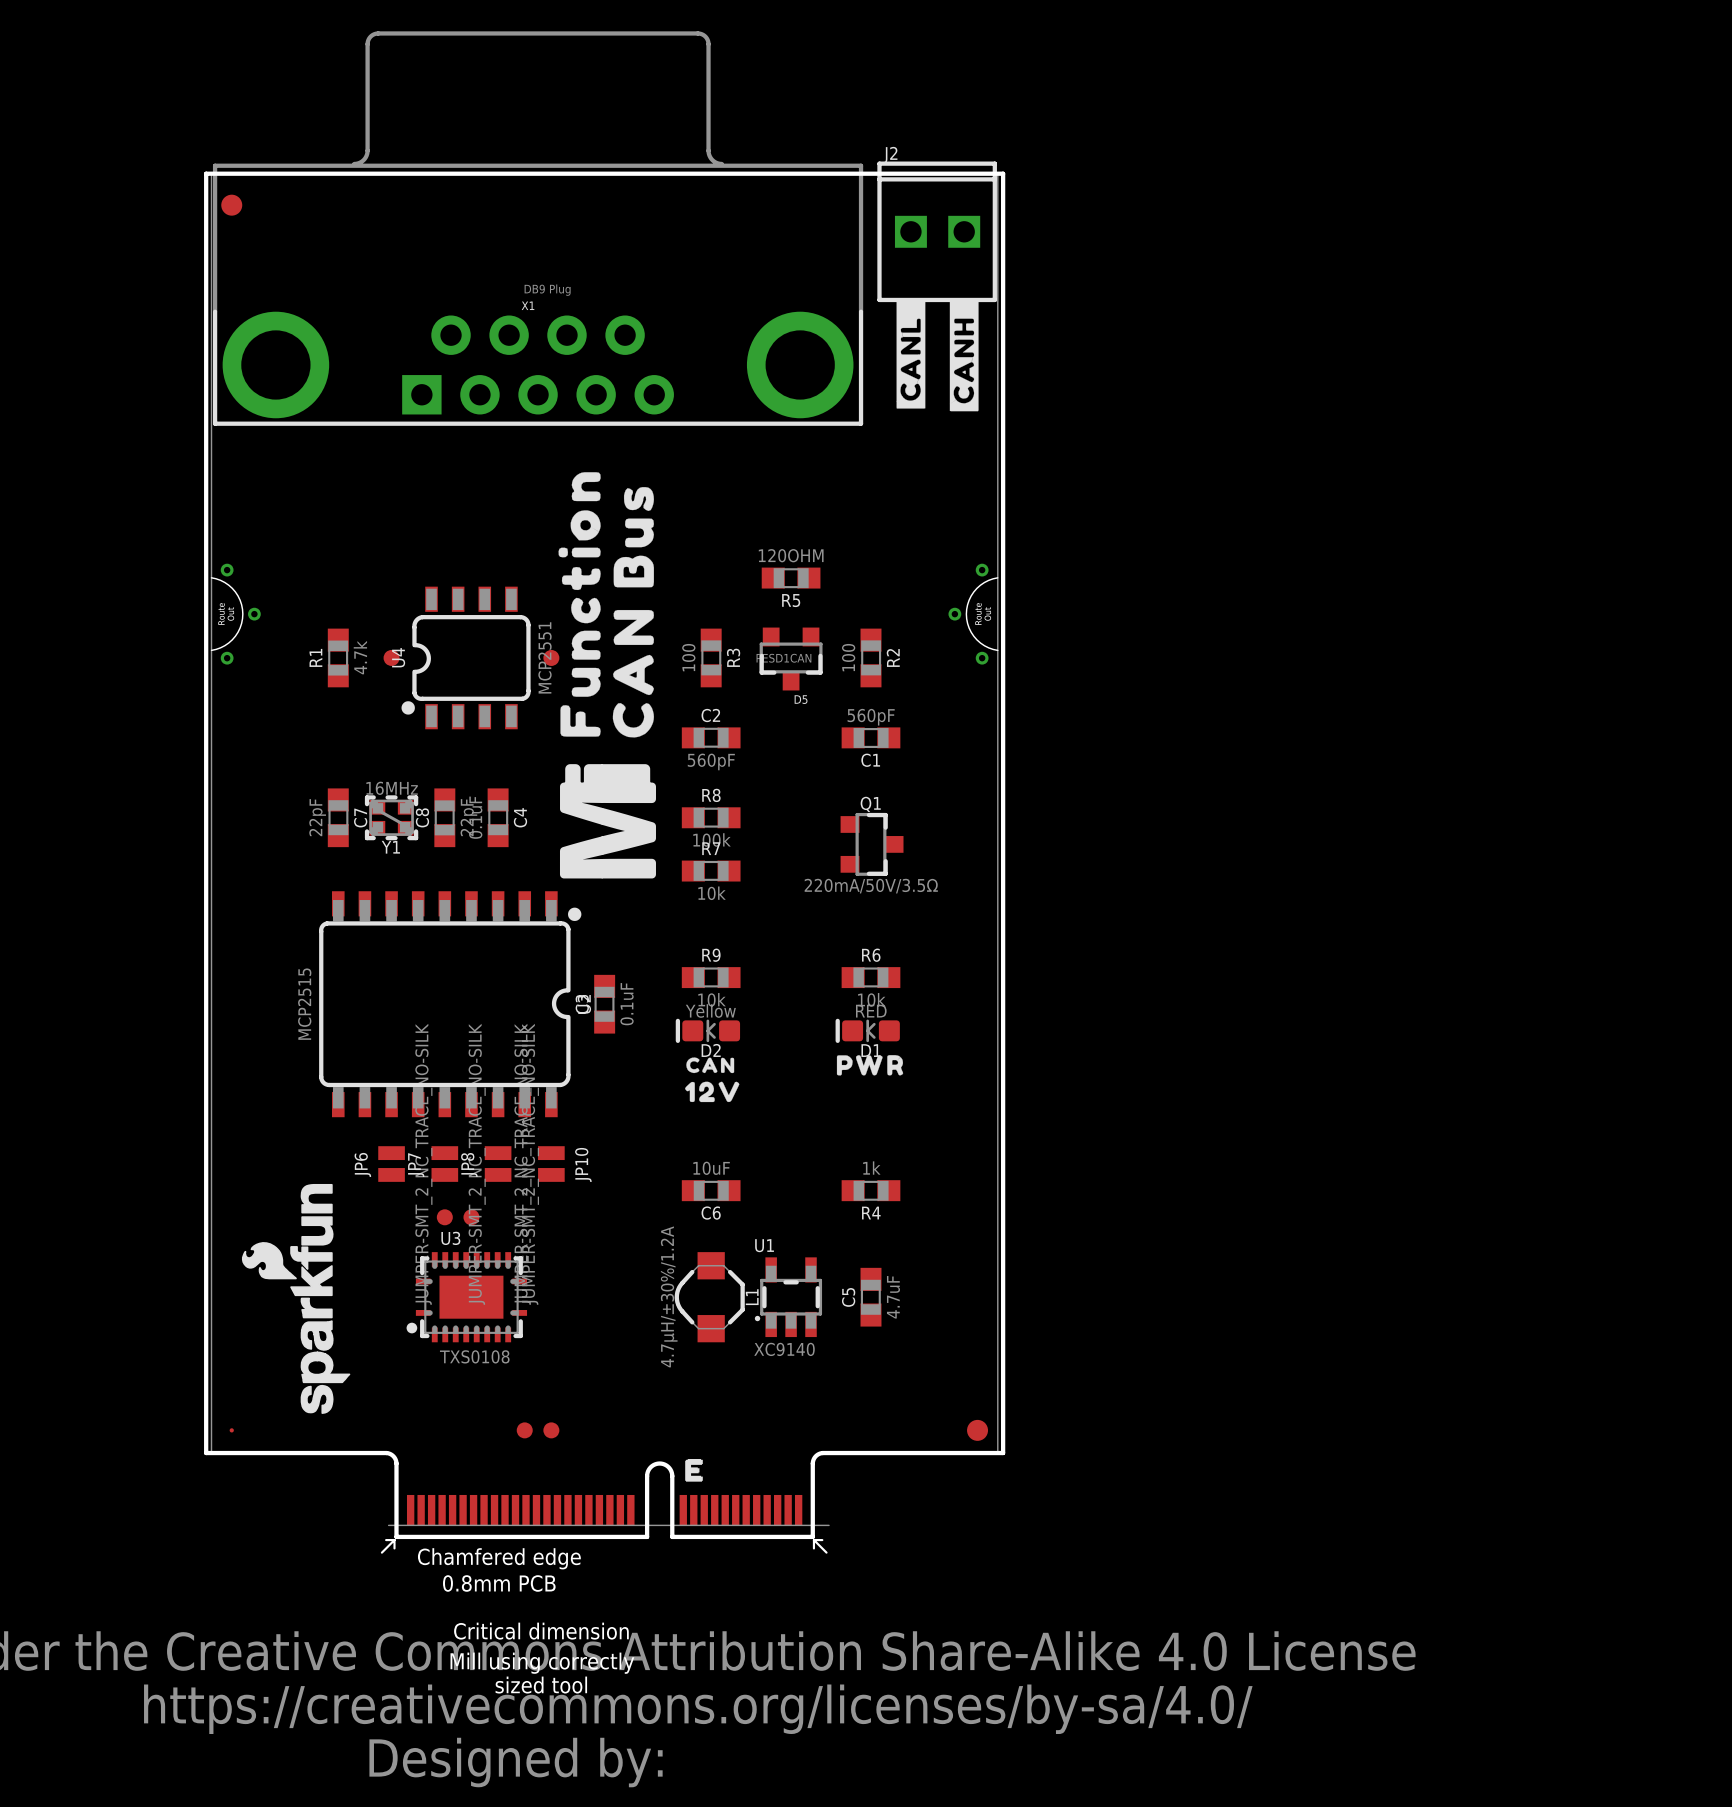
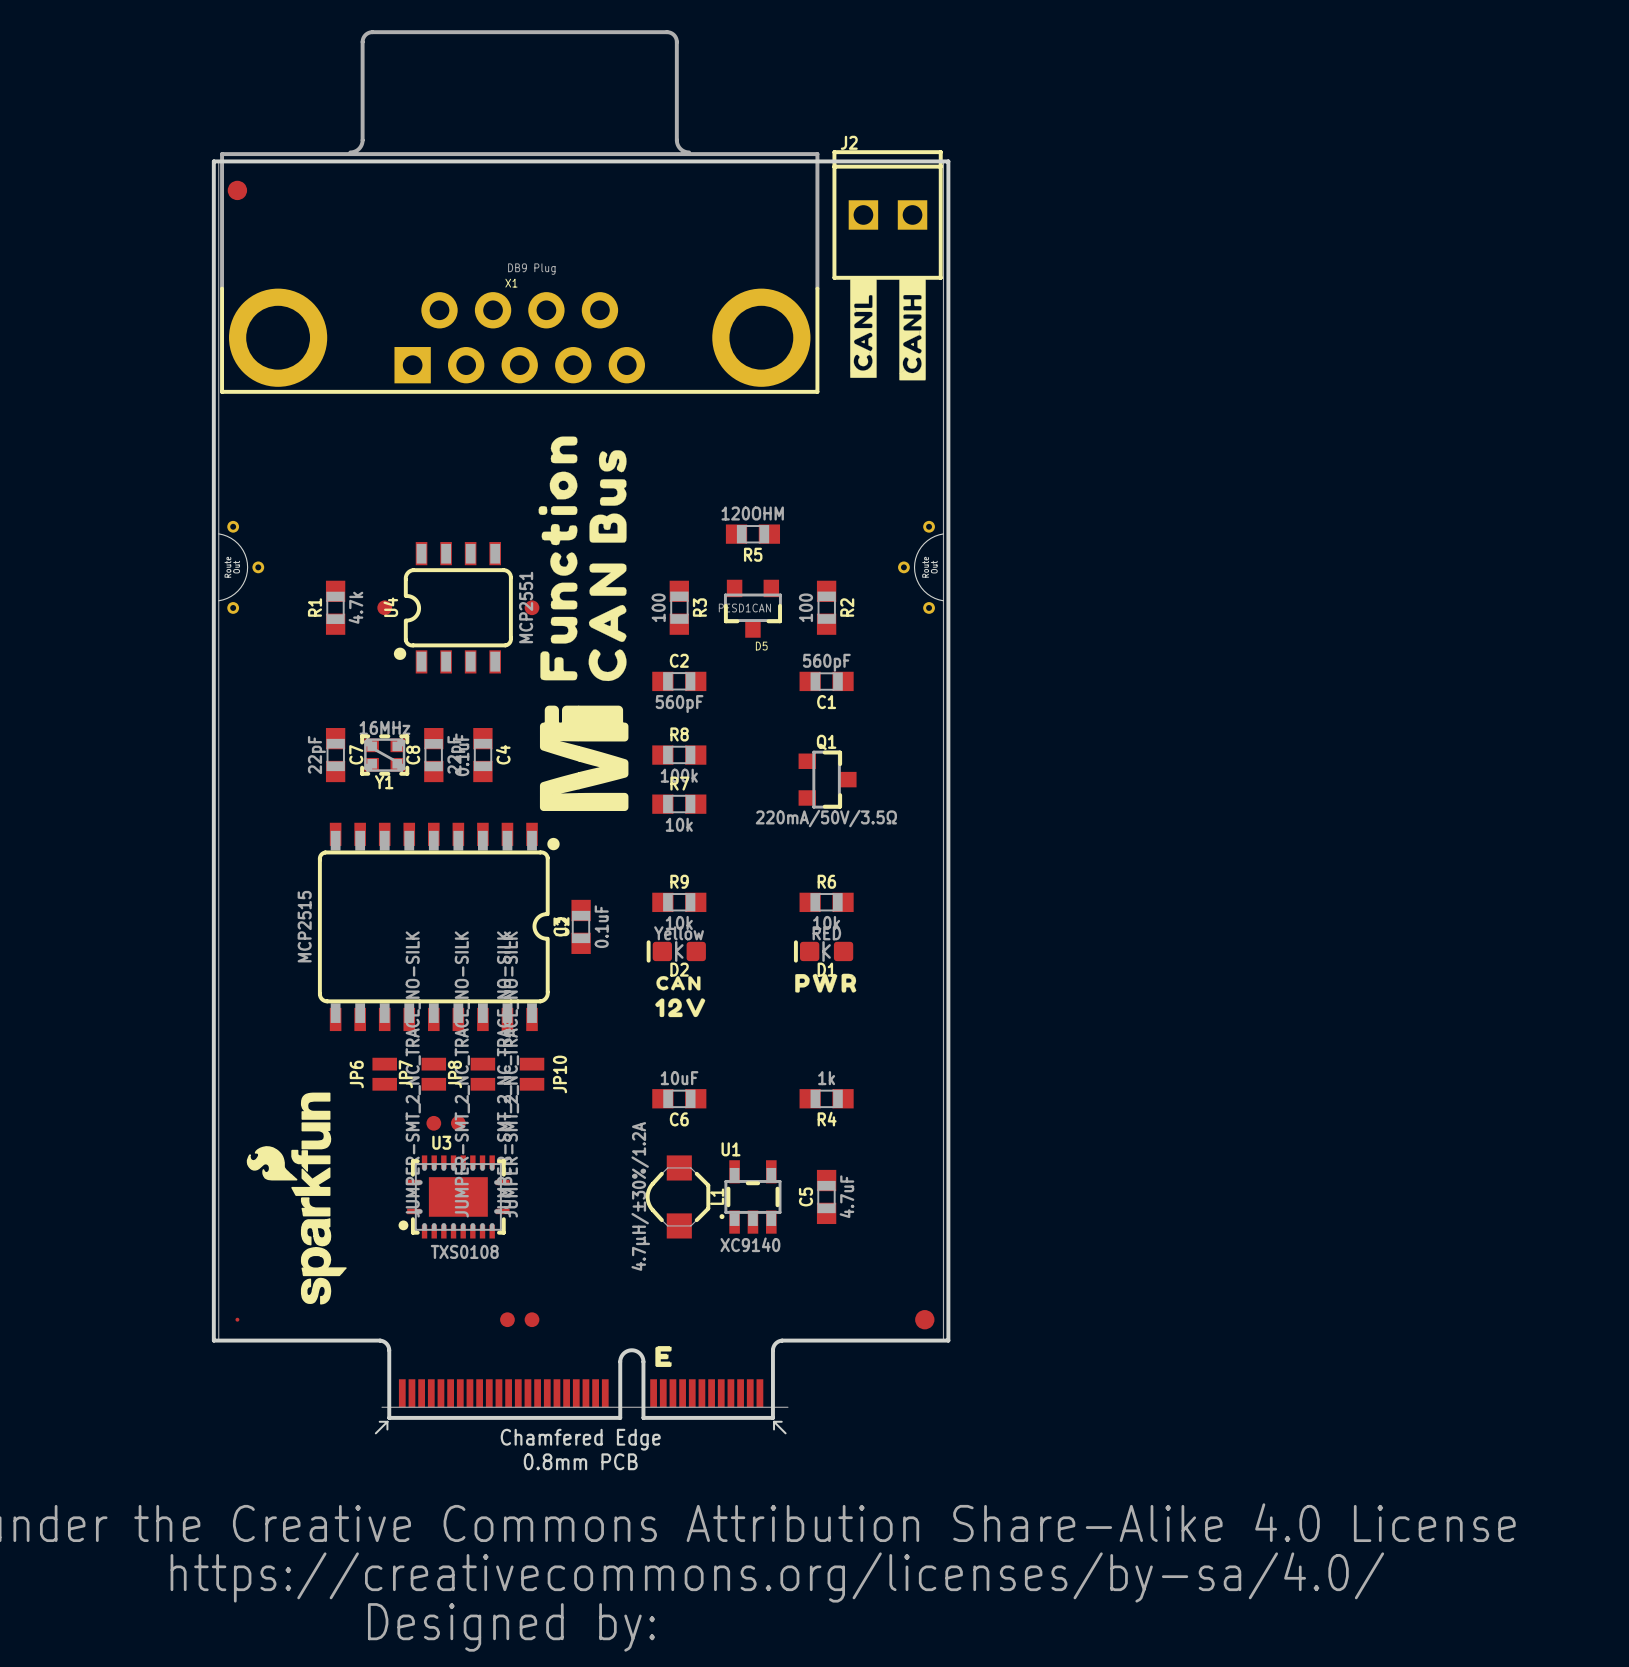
part footprint: [210, 173, 999, 1554] -> [218, 160, 944, 1435]

